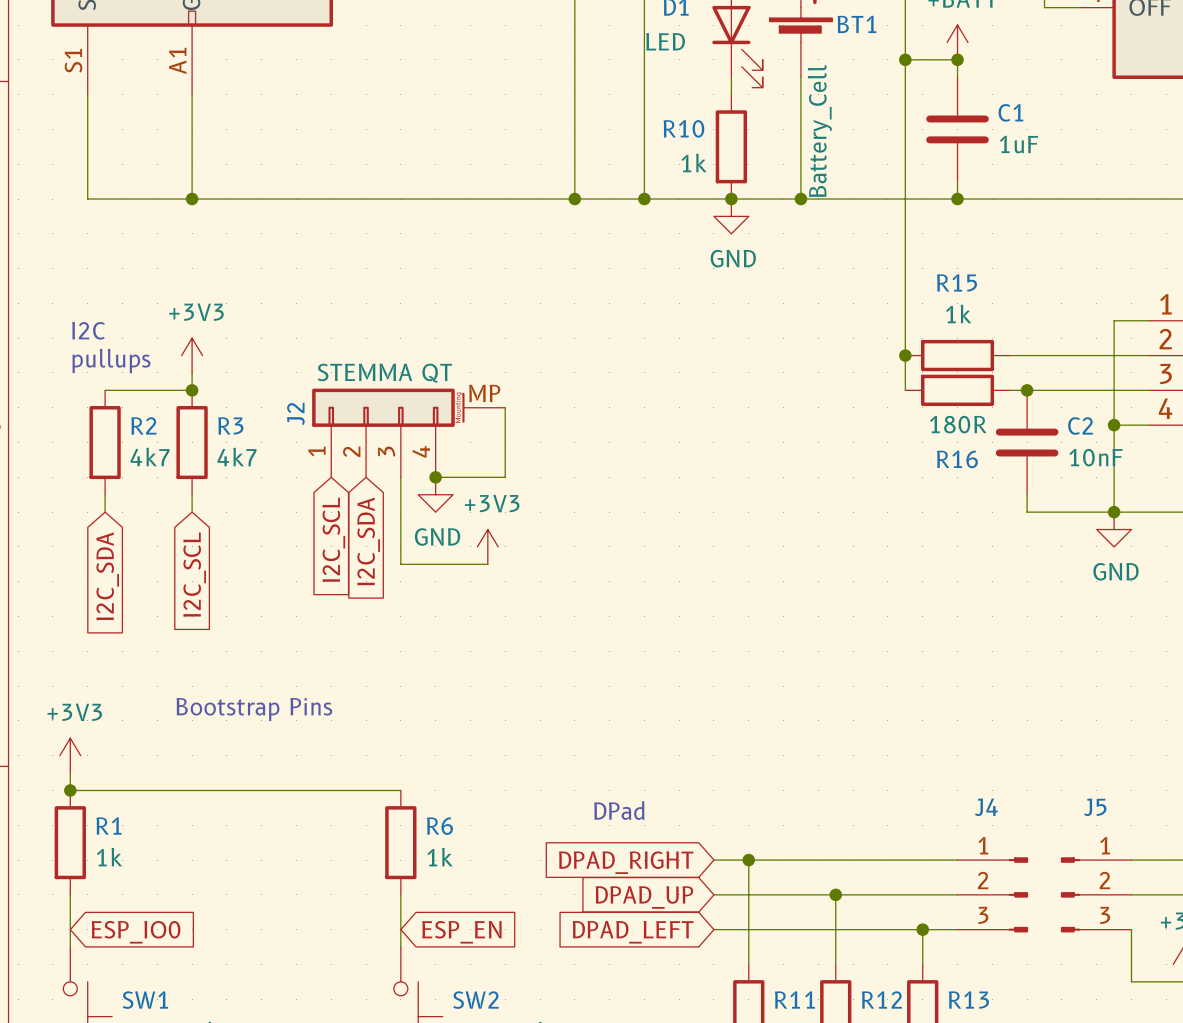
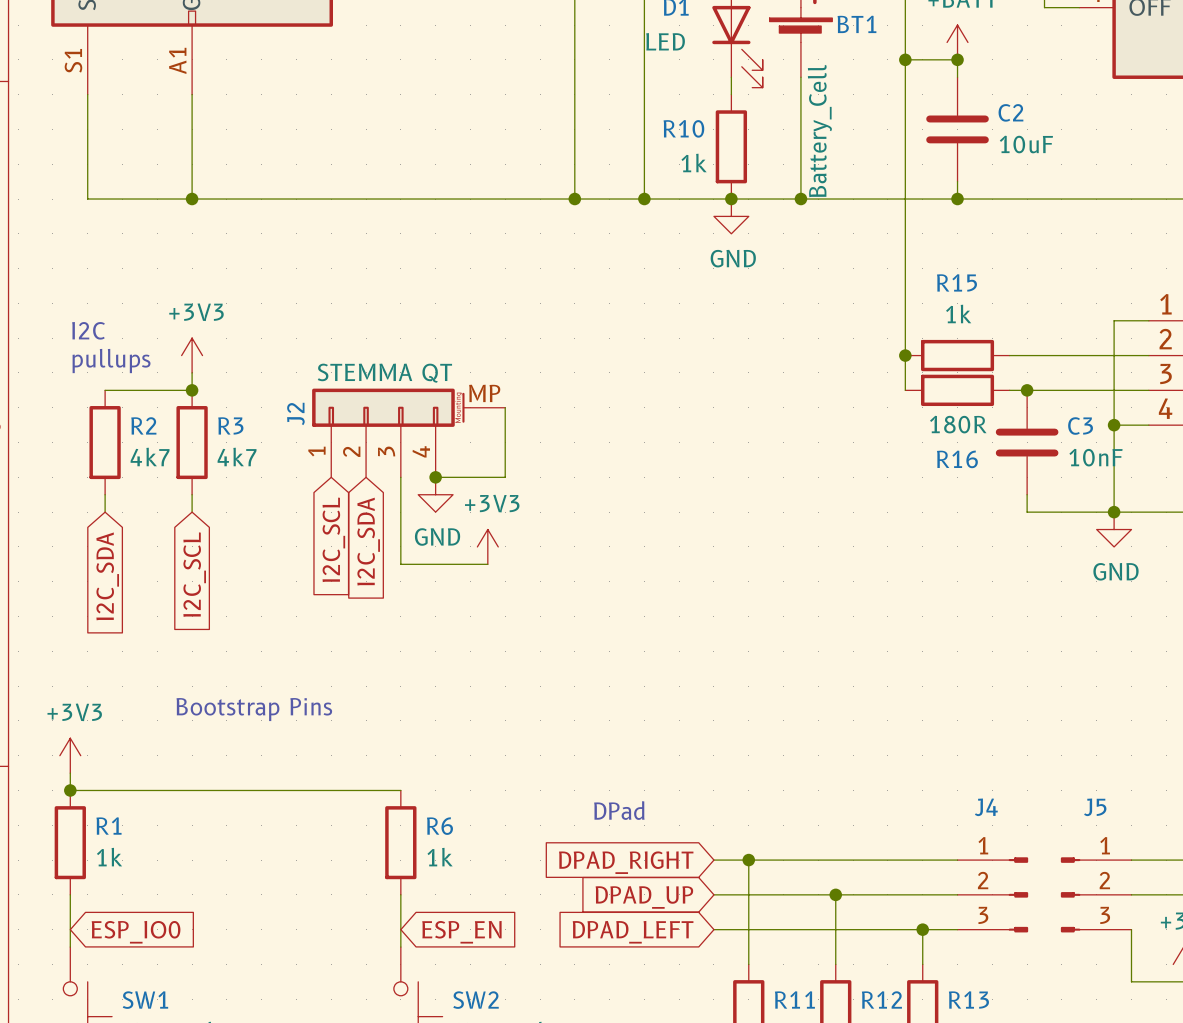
C1 name: C1 (1010, 112) -> C2 (1010, 112)
C1 value: 1uF (1018, 144) -> 10uF (1026, 144)
C2 name: C2 (1080, 426) -> C3 (1080, 426)

